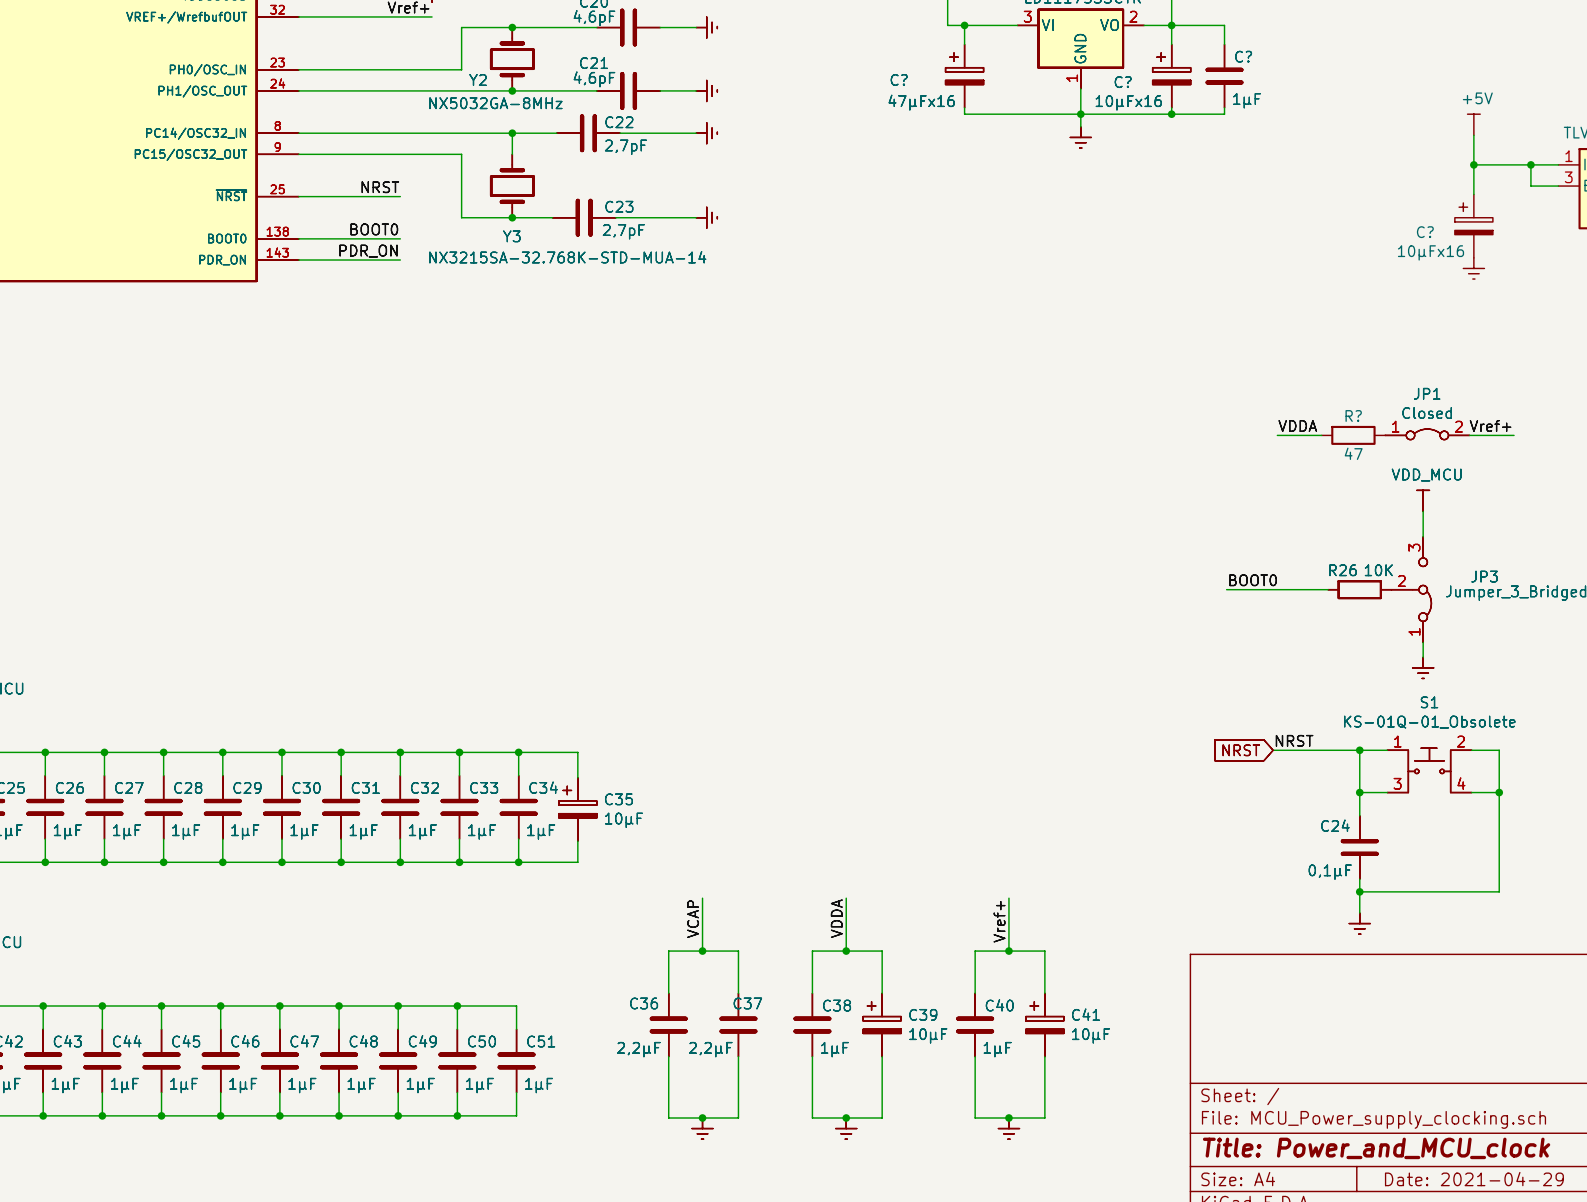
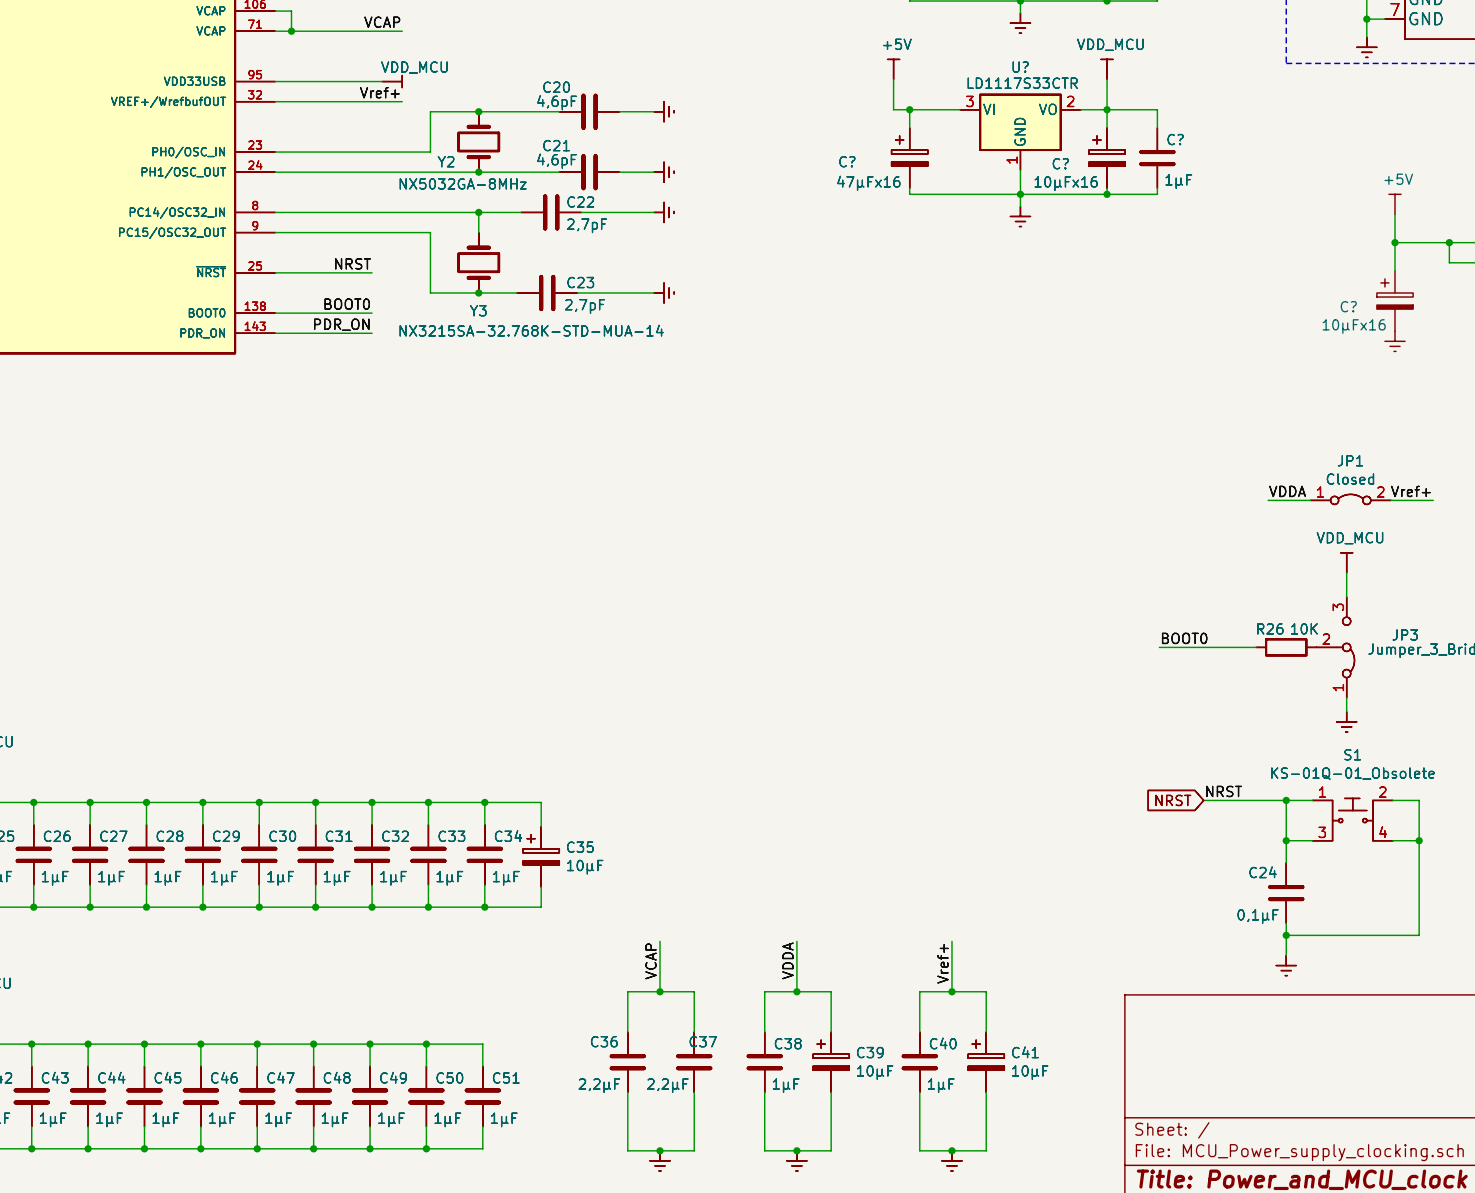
label position: VDDA (1297, 425) -> VDDA (1287, 491)
wire: (1277, 435) (1321, 435) -> (1268, 500) (1310, 500)
R?: 47 (1353, 435) -> none

